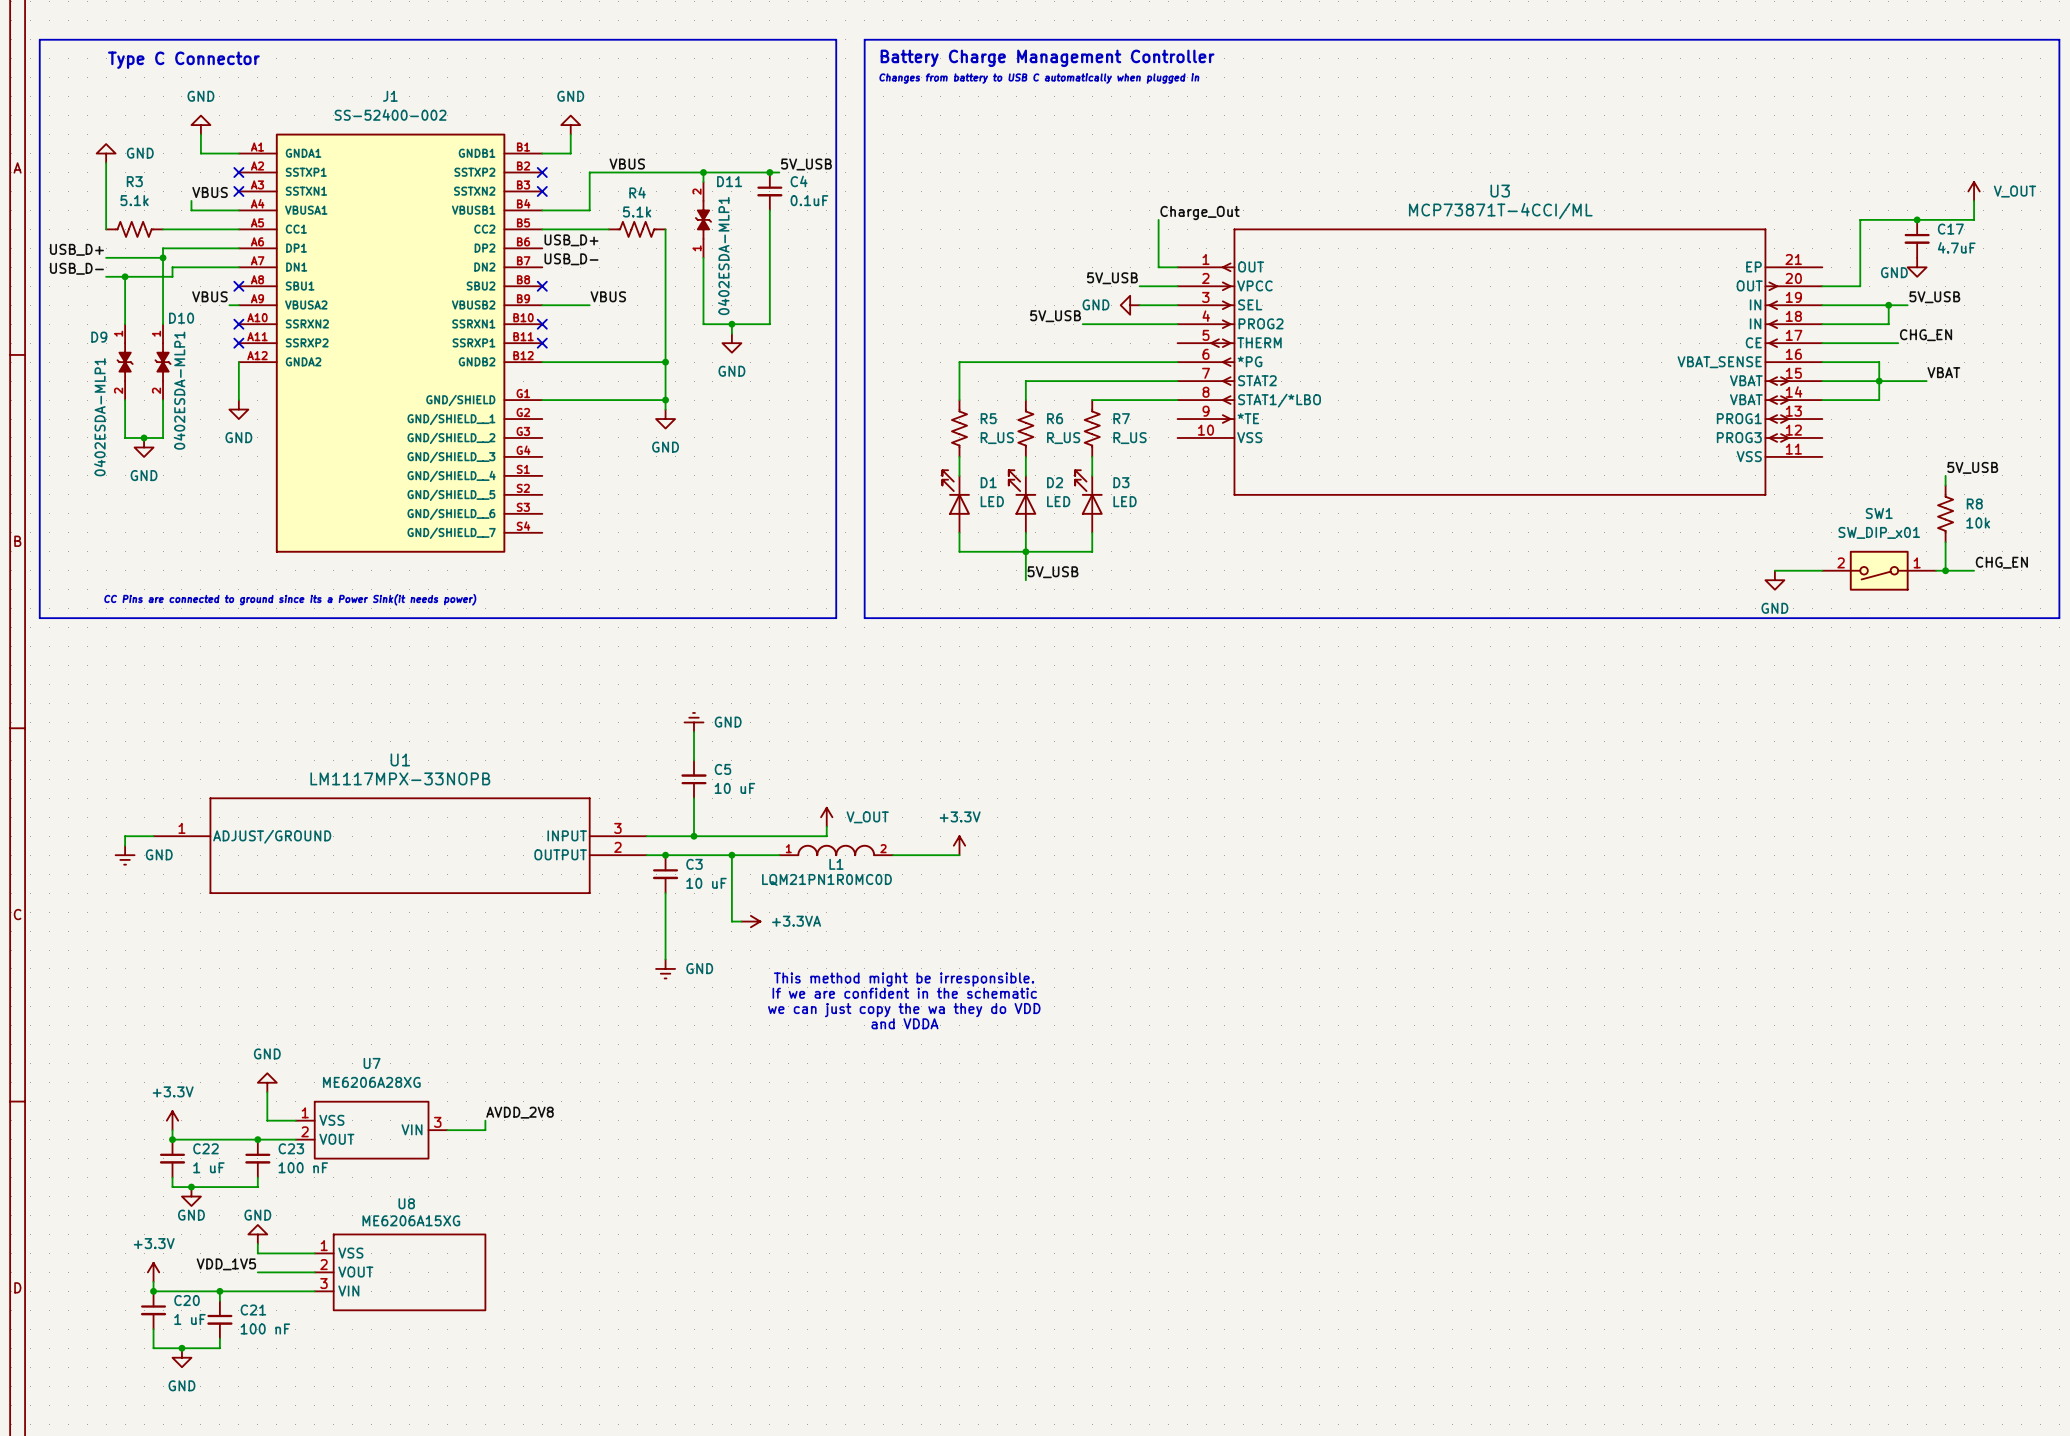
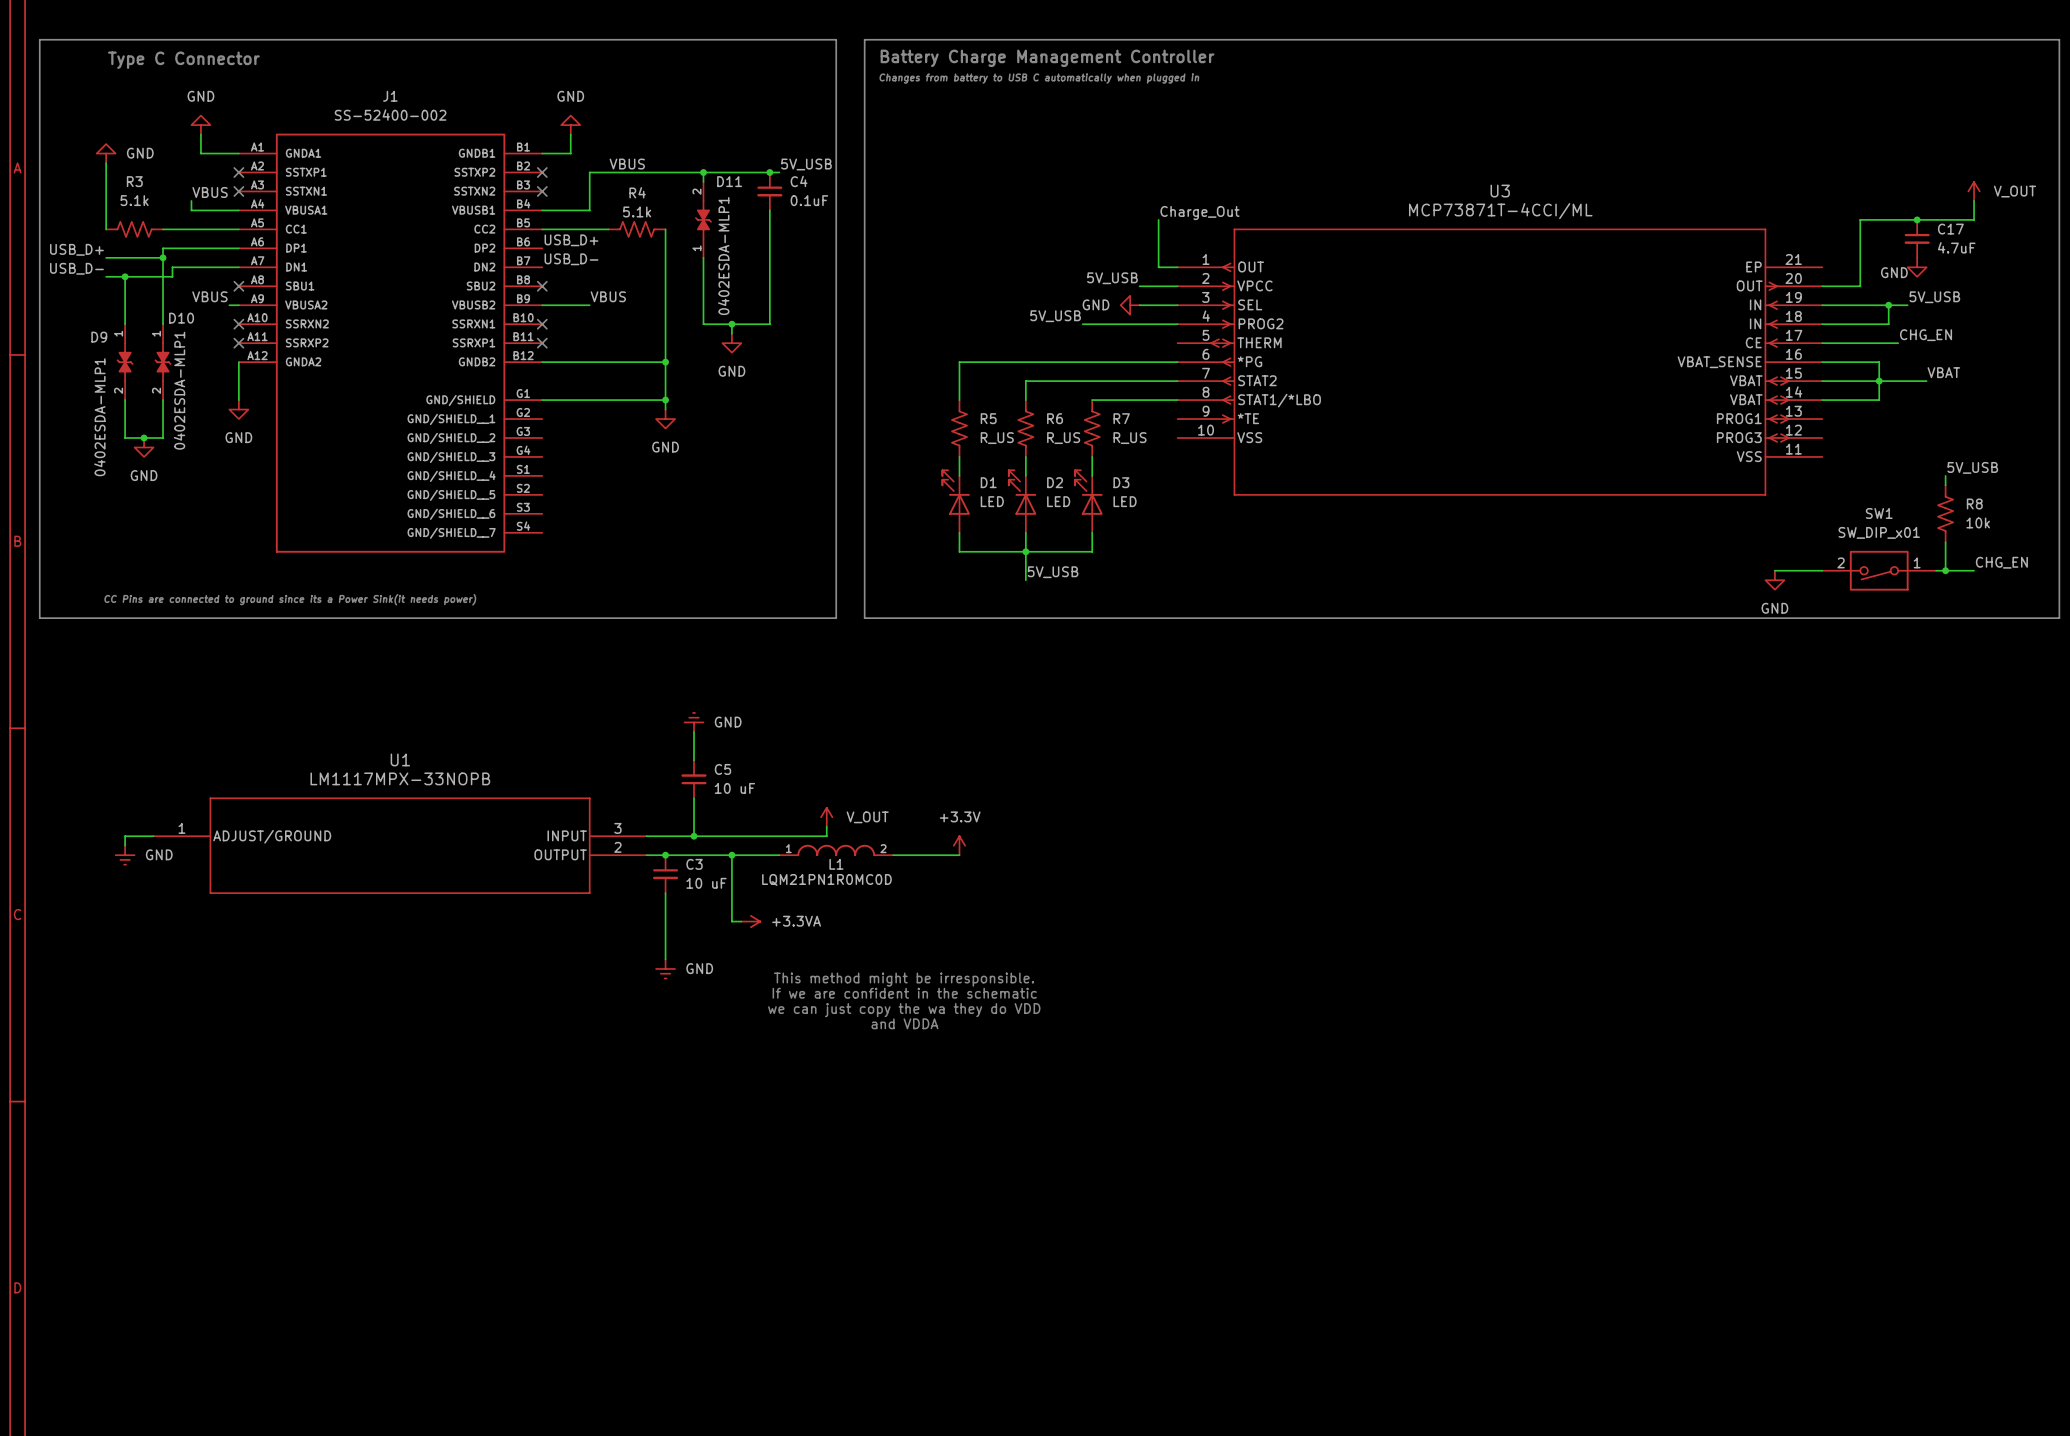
power symbol: GND (267, 1082) -> none
wire: (267, 1092) (267, 1120) (295, 1120) -> none
label: AVDD_2V8 (520, 1112) -> none
power symbol: +3.3V (172, 1120) -> none
wire: (485, 1120) (485, 1130) (447, 1130) -> none
wire: (172, 1130) (172, 1139) (295, 1139) -> none
U7: ME6206A28XG (371, 1130) -> none
junction: (172, 1139) -> none
junction: (257, 1139) -> none
C22: 1 uF (172, 1158) -> none
C23: 100 nF (257, 1158) -> none
wire: (172, 1177) (172, 1187) (257, 1187) (257, 1177) -> none
junction: (191, 1187) -> none
power symbol: GND (191, 1196) -> none
power symbol: GND (257, 1234) -> none
wire: (257, 1243) (257, 1253) (314, 1253) -> none
label: VDD_1V5 (226, 1264) -> none
power symbol: +3.3V (153, 1272) -> none
wire: (257, 1272) (314, 1272) -> none
U8: ME6206A15XG (400, 1272) -> none
wire: (153, 1281) (153, 1291) (314, 1291) -> none
junction: (153, 1291) -> none
wire: (219, 1291) (219, 1300) -> none
junction: (219, 1291) -> none
C20: 1 uF (153, 1310) -> none
C21: 100 nF (219, 1319) -> none
wire: (153, 1329) (153, 1348) (219, 1348) (219, 1338) -> none
junction: (181, 1348) -> none
power symbol: GND (181, 1357) -> none

